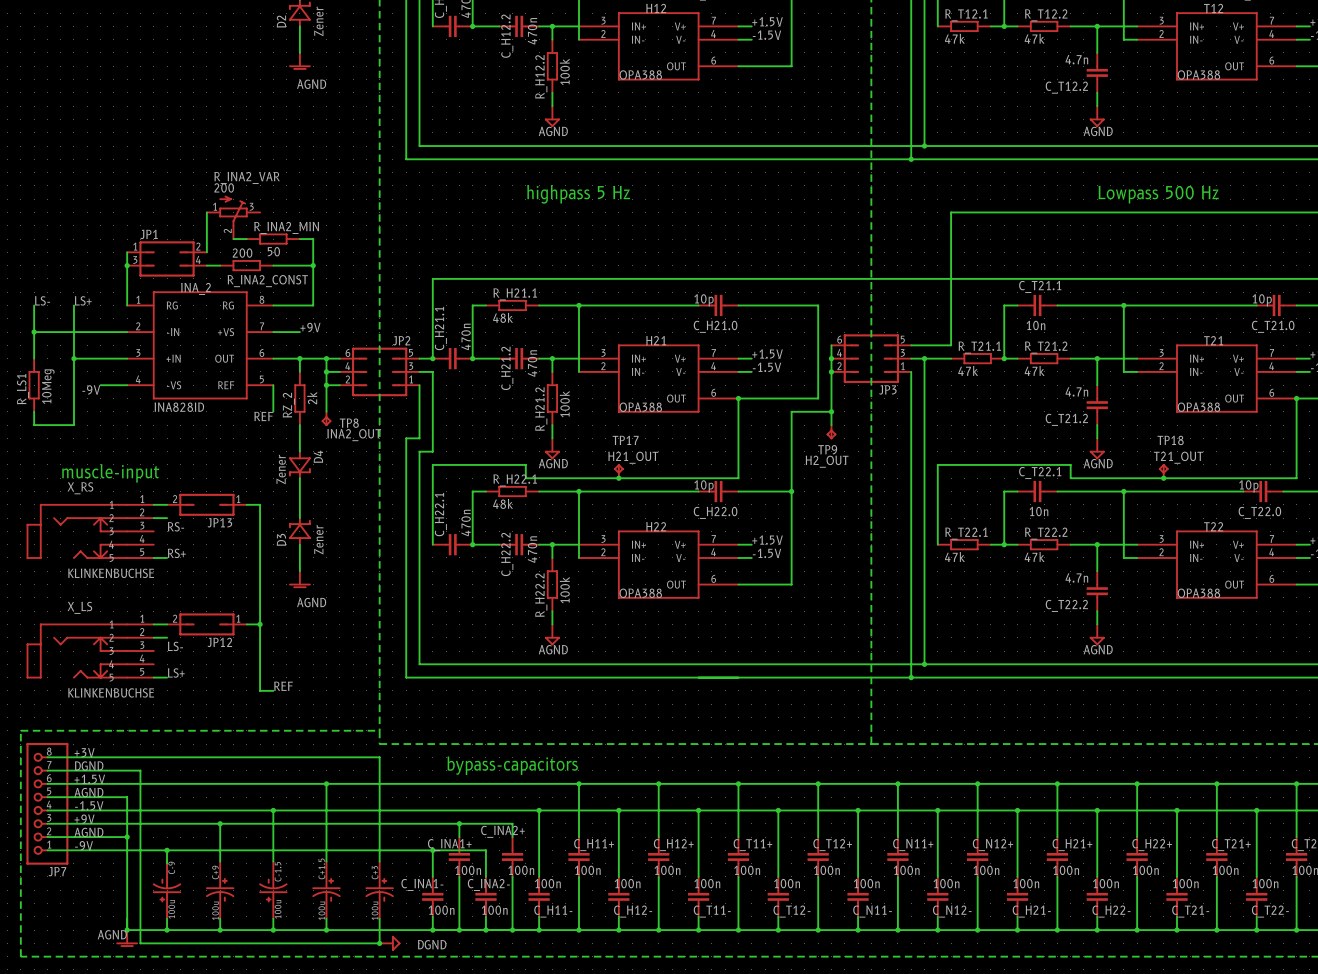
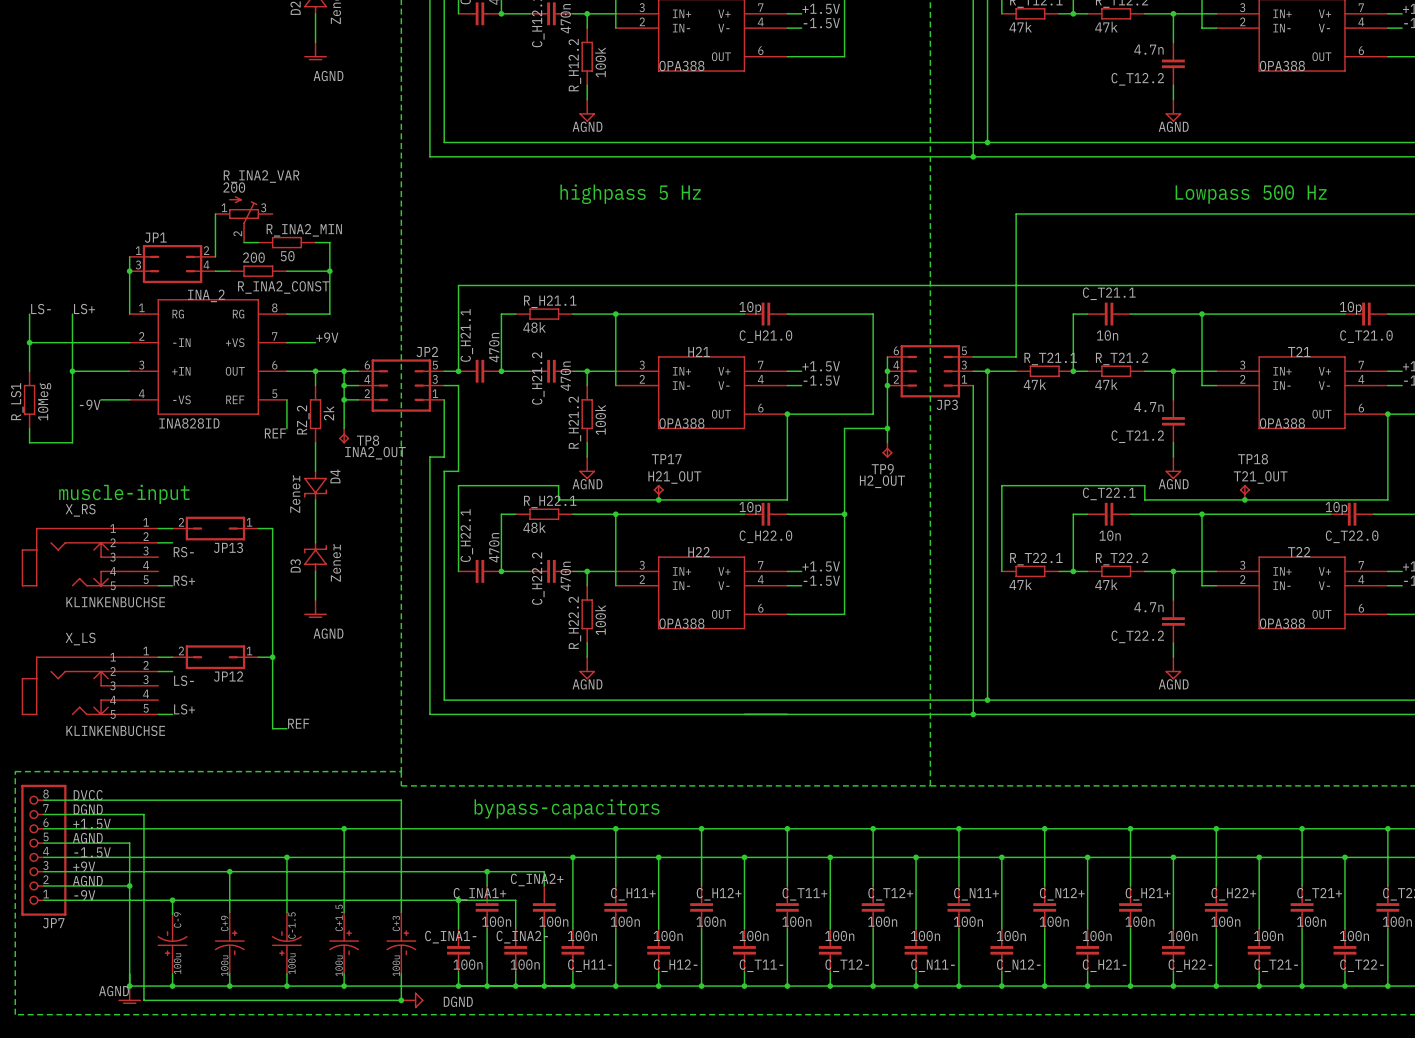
label: +3V (84, 752) -> DVCC (88, 795)

